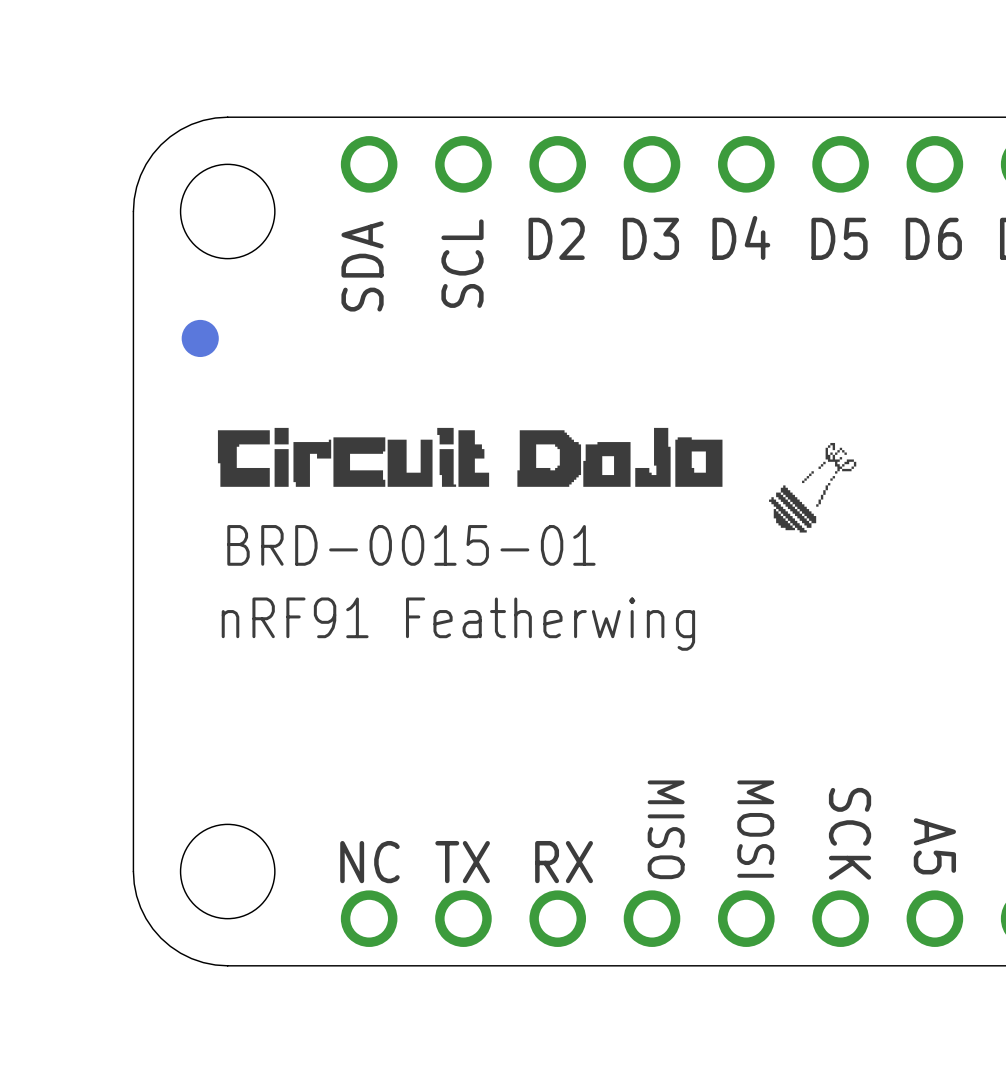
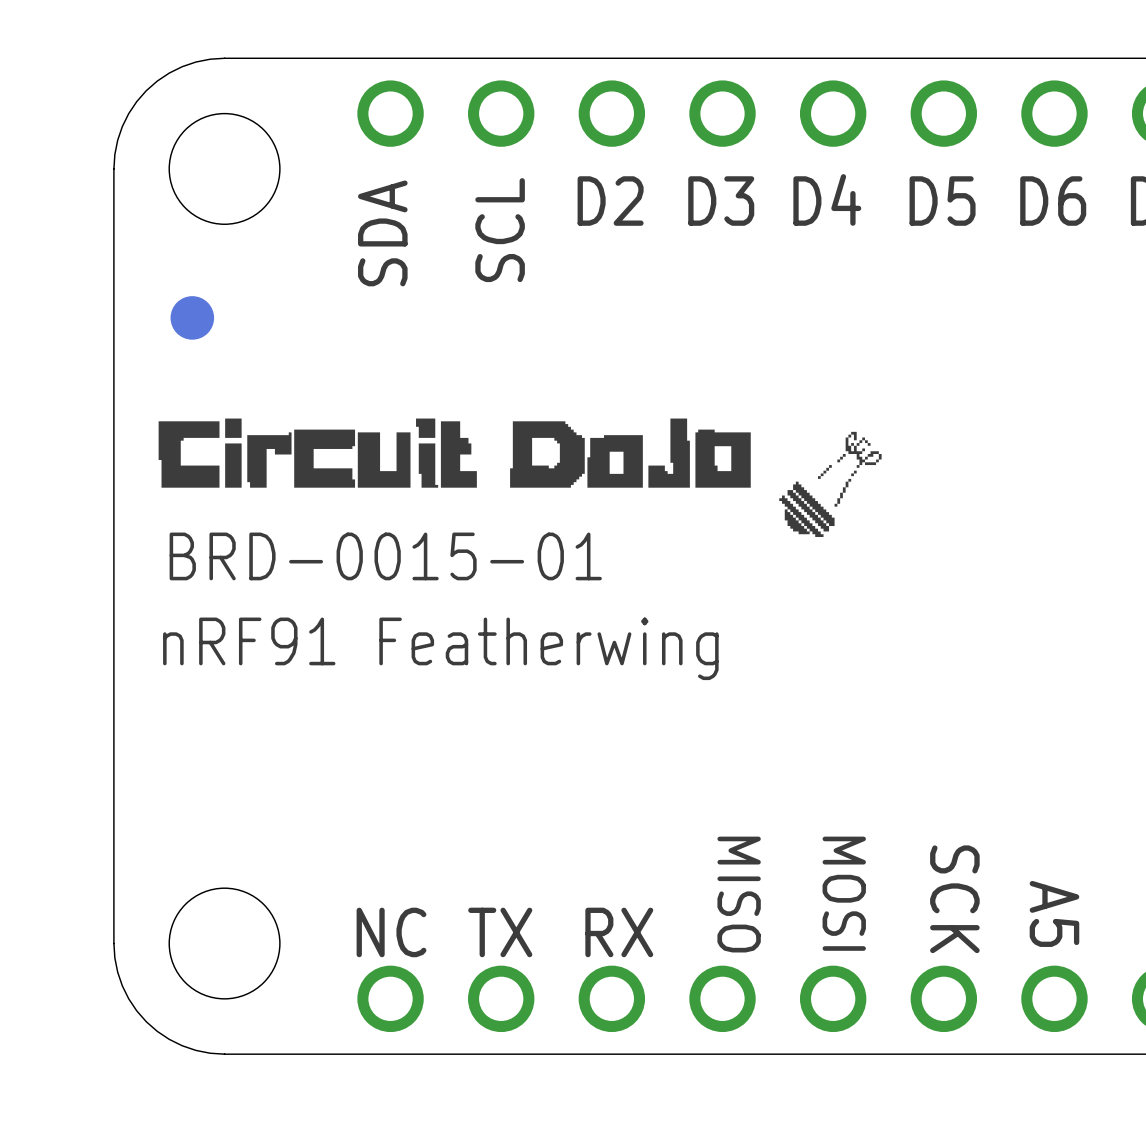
drawing position: (470, 457) -> (454, 453)
drawing position: (812, 487) -> (830, 484)
text position: BRD-0015-01 (411, 545) -> BRD-0015-01 (385, 556)
text position: nRF91 Featherwing (458, 624) -> nRF91 Featherwing (440, 648)

